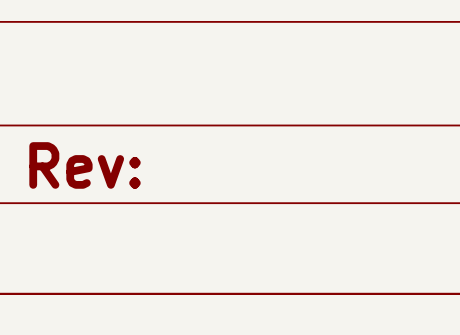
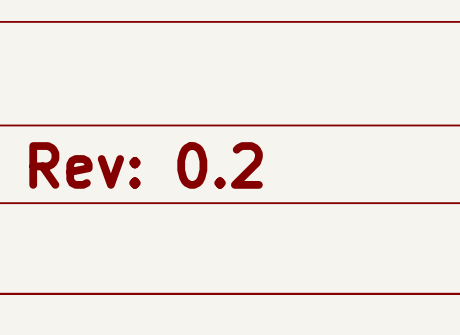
title block: Rev: (85, 165) -> Rev: 0.2 (146, 165)

